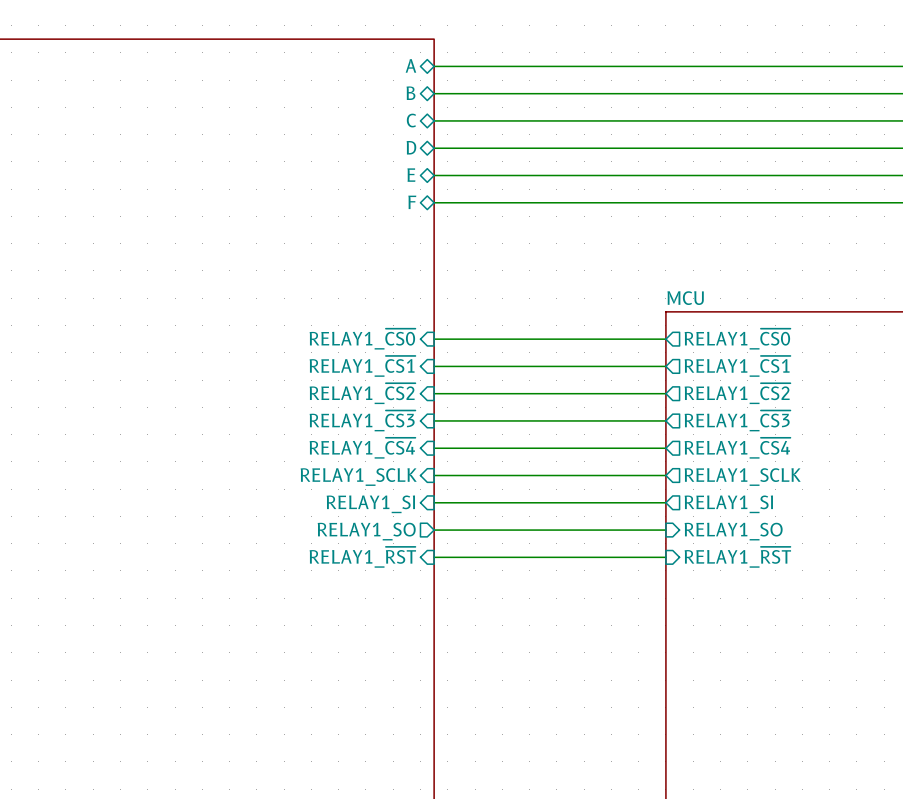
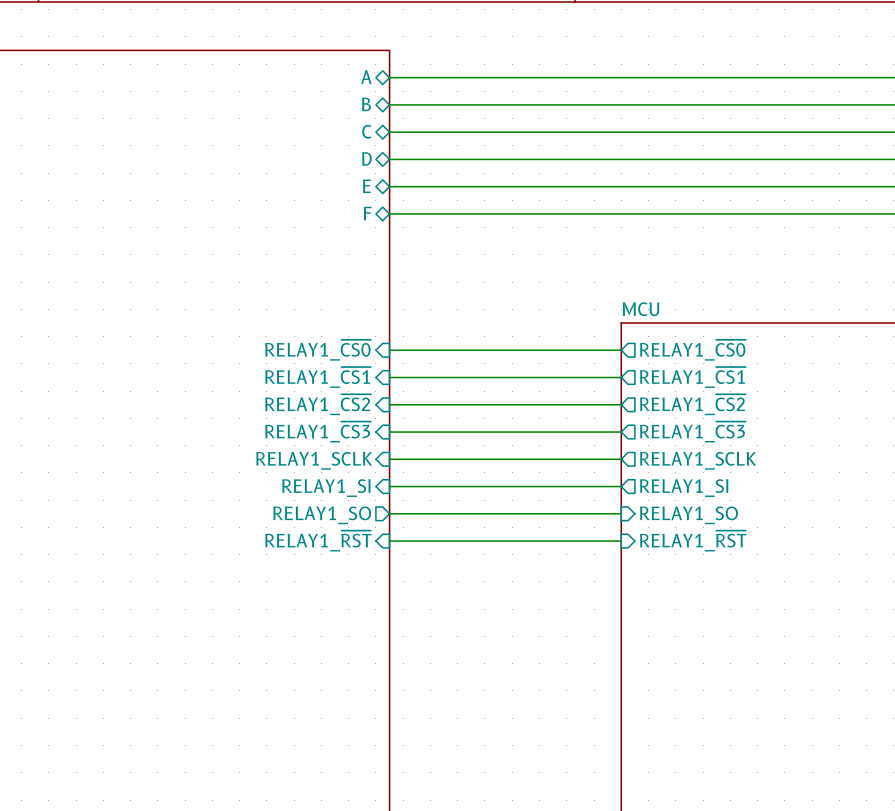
sheet pin: RELAY1_~{CS4} (362, 448) -> RELAY1_SCLK (314, 460)
sheet pin: RELAY1_~{CS4} (737, 448) -> RELAY1_SCLK (697, 460)
sheet pin: RELAY1_SCLK (358, 477) -> RELAY1_SI (326, 488)
sheet pin: RELAY1_SCLK (742, 477) -> RELAY1_SI (684, 488)
sheet pin shape: input (370, 504) -> output (322, 515)
sheet pin: RELAY1_SI (370, 504) -> RELAY1_SO (322, 515)
sheet pin shape: output (728, 504) -> input (688, 515)
sheet pin: RELAY1_SI (728, 504) -> RELAY1_SO (688, 515)
sheet pin shape: output (366, 531) -> input (318, 541)
sheet pin: RELAY1_SO (366, 531) -> RELAY1_~{RST} (318, 541)
sheet pin: RELAY1_SO (733, 531) -> RELAY1_~{RST} (693, 541)
sheet pin: RELAY1_~{RST} (362, 557) -> none
wire: (434, 557) (665, 557) -> none
sheet pin: RELAY1_~{RST} (737, 557) -> none

